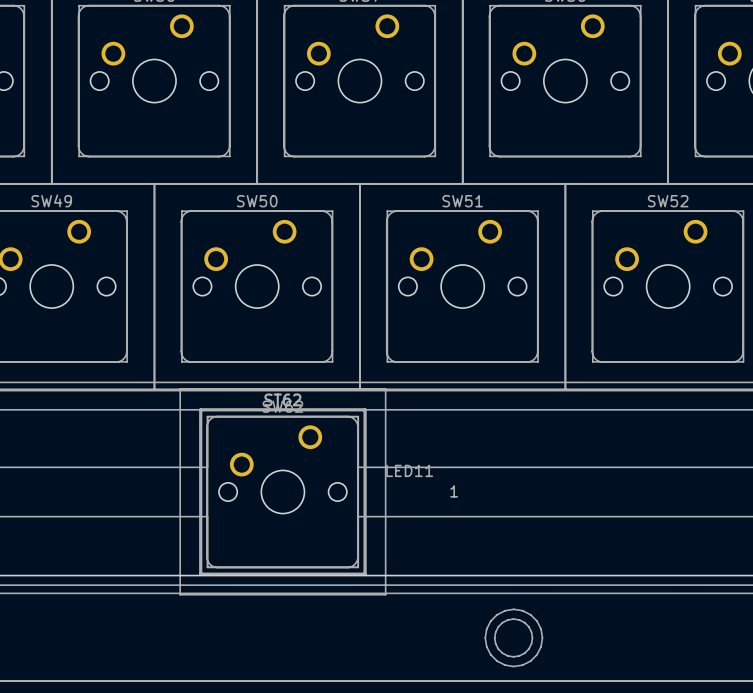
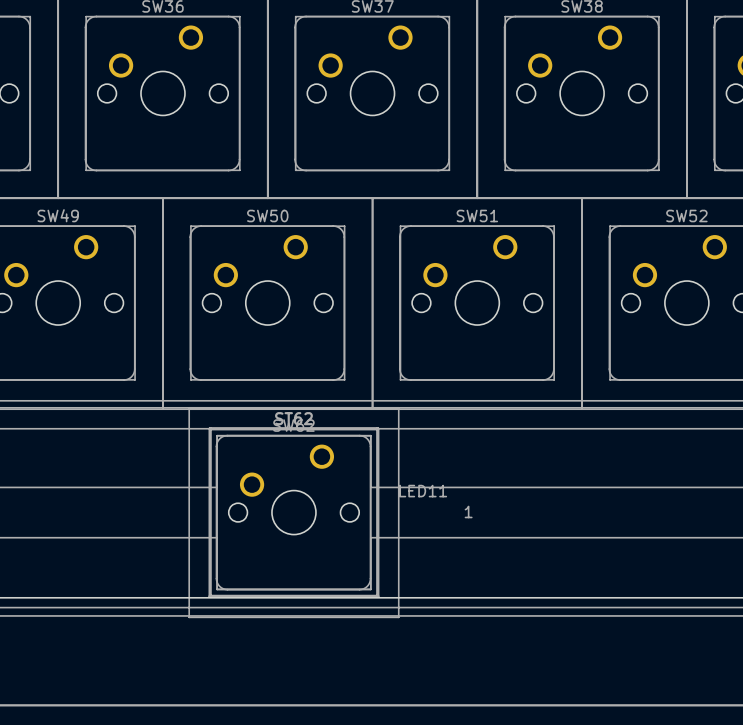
line: (513, 609) (505, 610) (490, 621) (485, 637) (490, 654) (497, 661) (513, 666) (530, 661) (537, 654) (542, 637) (537, 621) (522, 610) (513, 609) -> none
line: (513, 619) (502, 622) (498, 626) (494, 637) (498, 649) (502, 653) (513, 656) (524, 653) (528, 649) (532, 637) (528, 626) (524, 622) (513, 619) -> none

